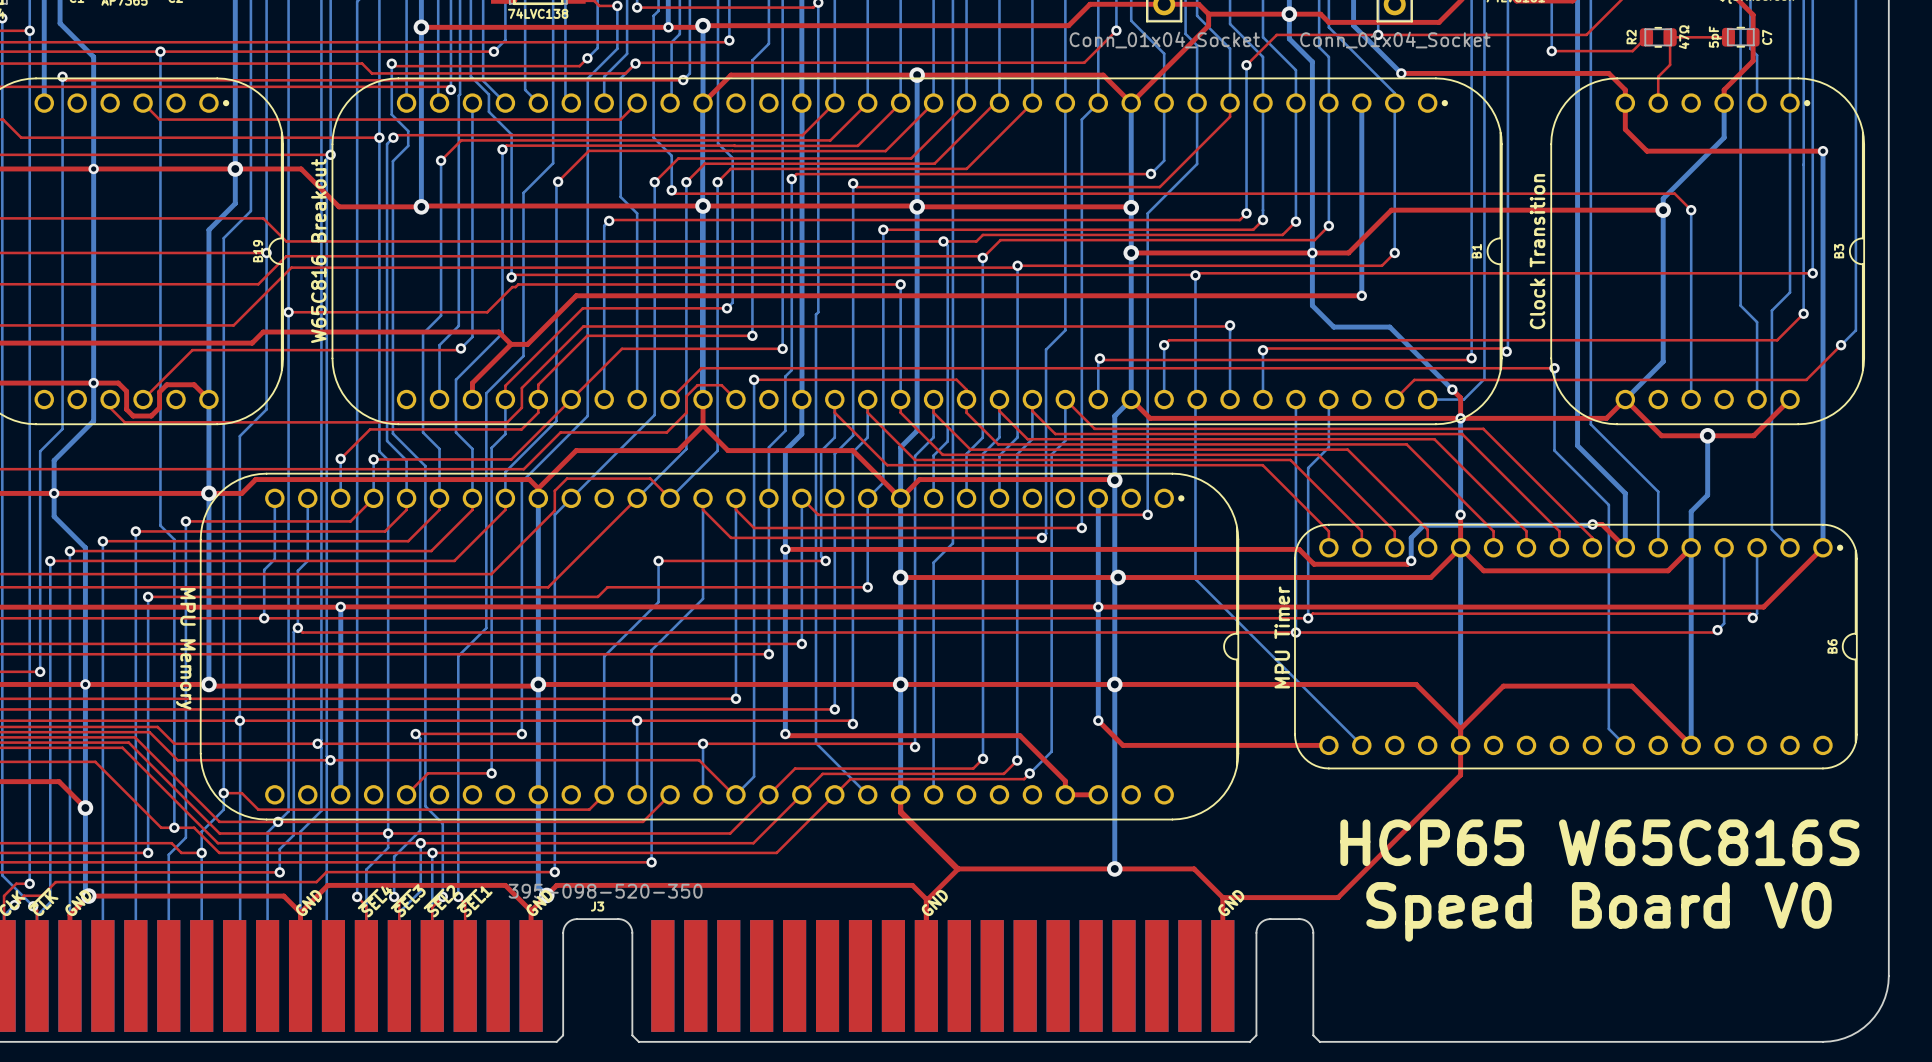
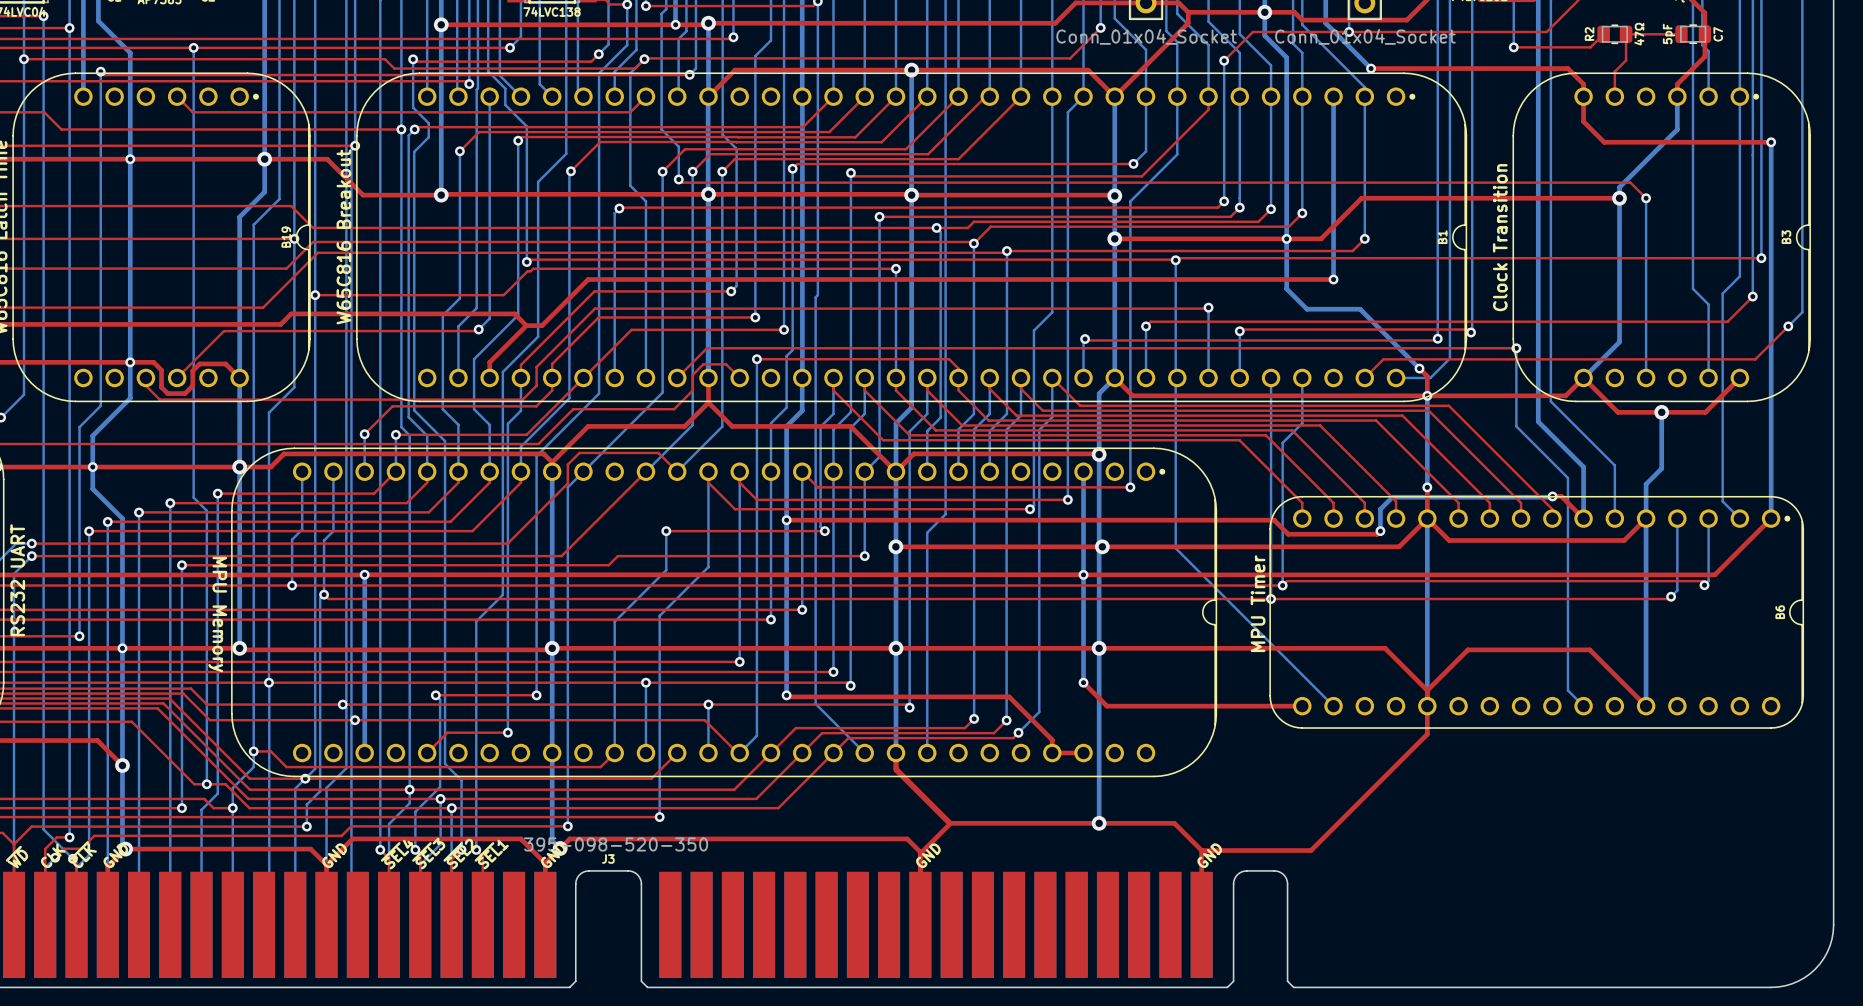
text: HCP65 W65C816S (1599, 842) -> none
text: Speed Board V0 (1598, 911) -> none

